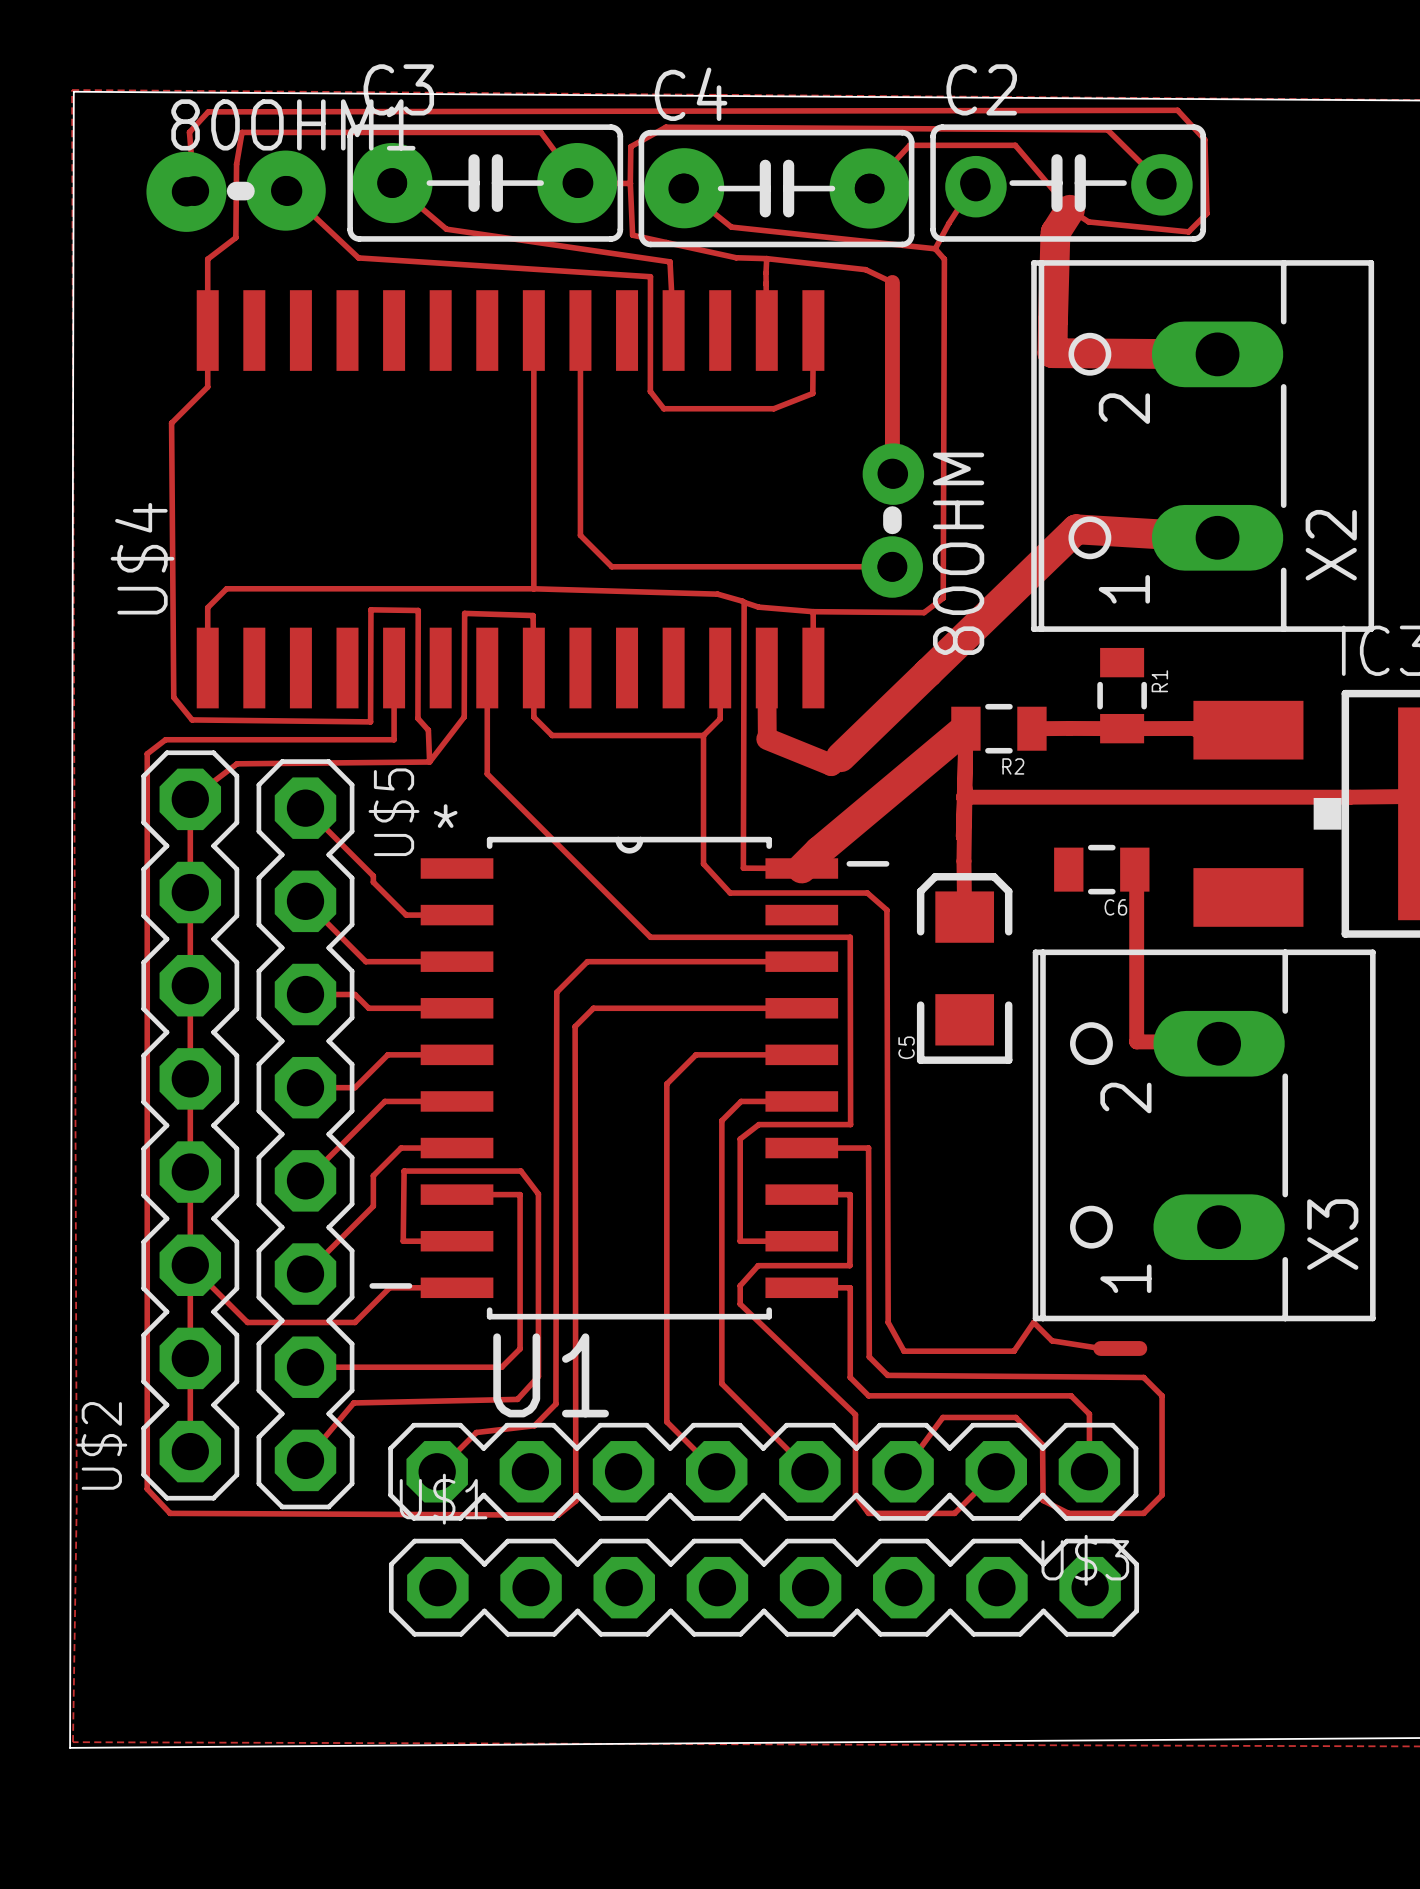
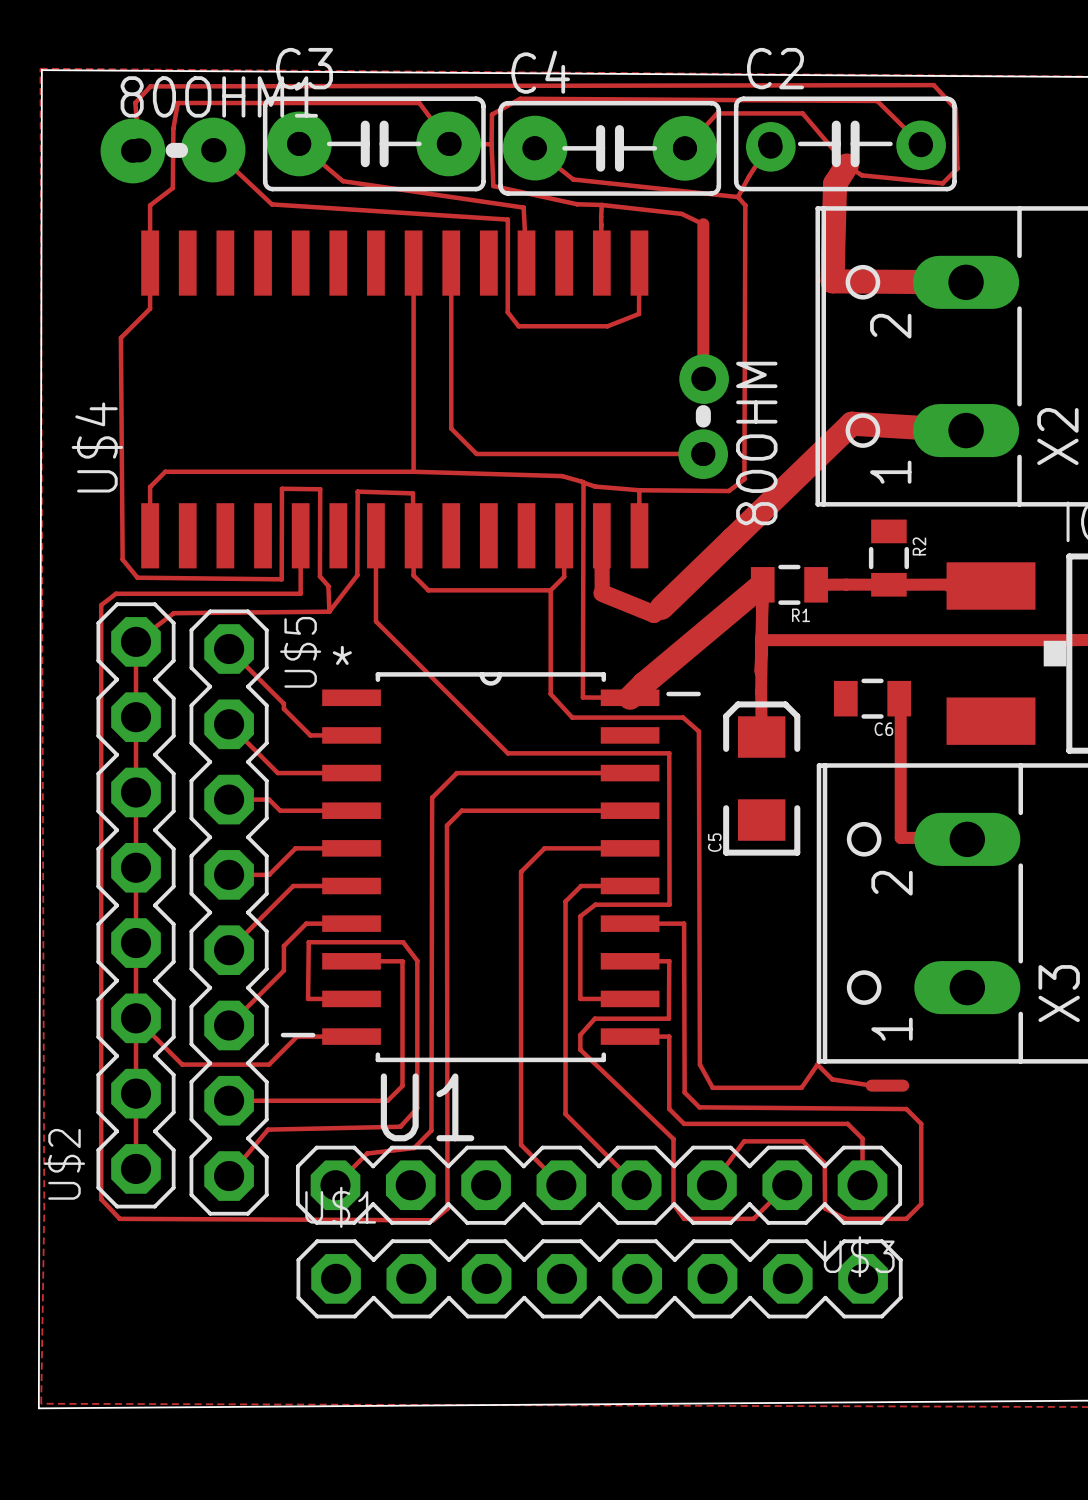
R1 name: R1 (1159, 681) -> R2 (919, 546)
R2 name: R2 (1013, 766) -> R1 (801, 615)

